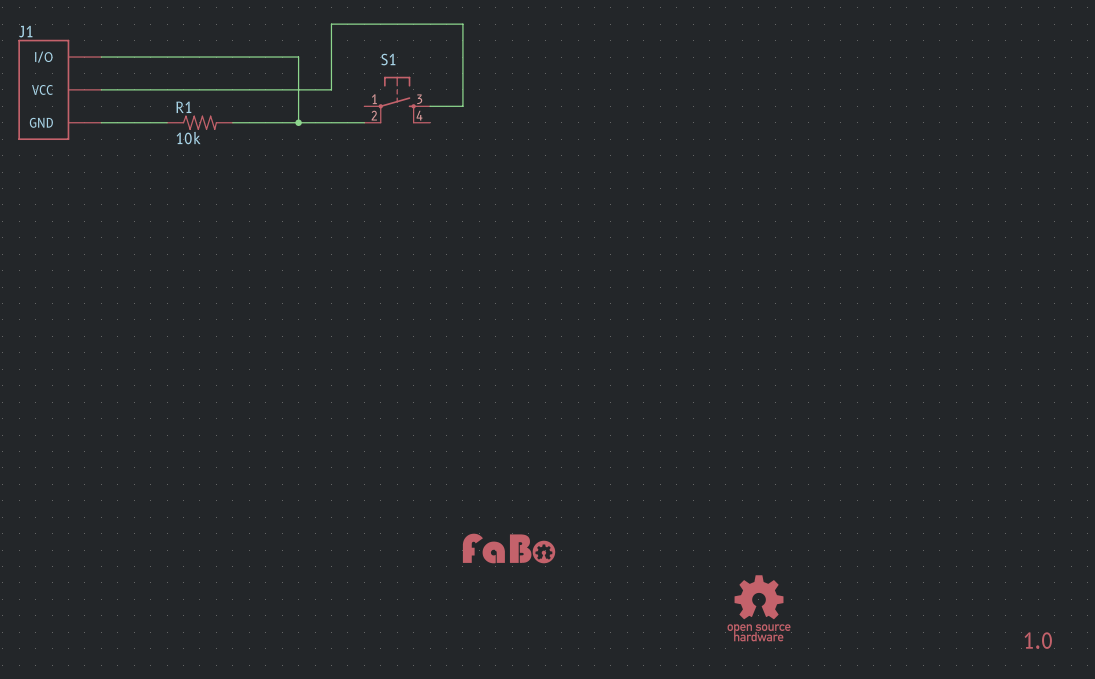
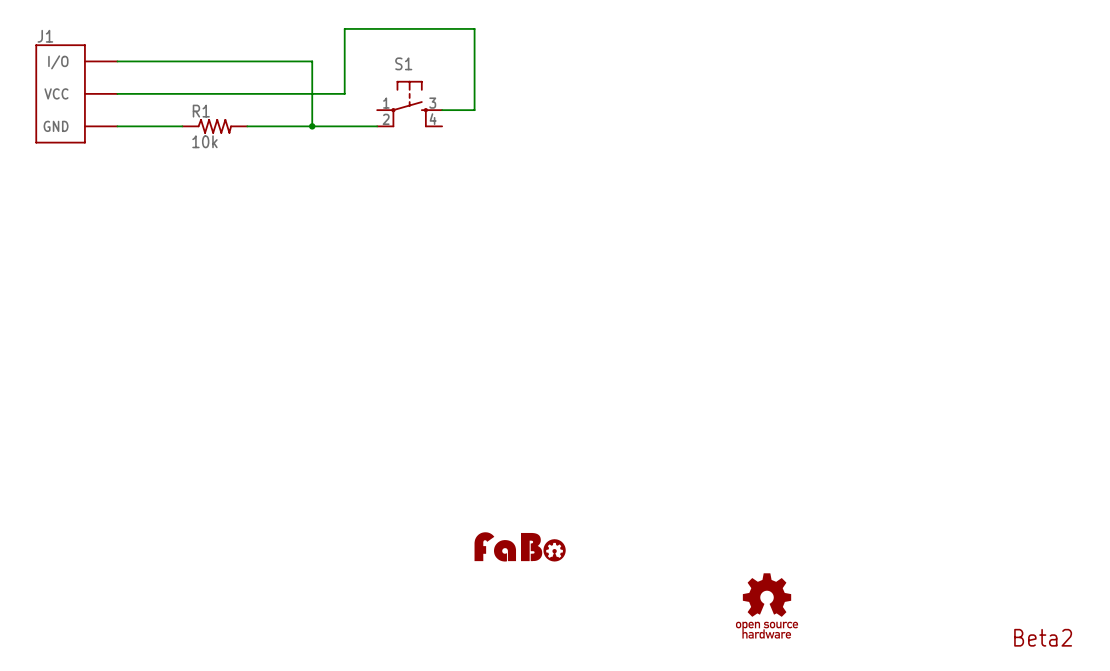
text: 1.0 (1038, 640) -> Beta2 (1043, 637)

